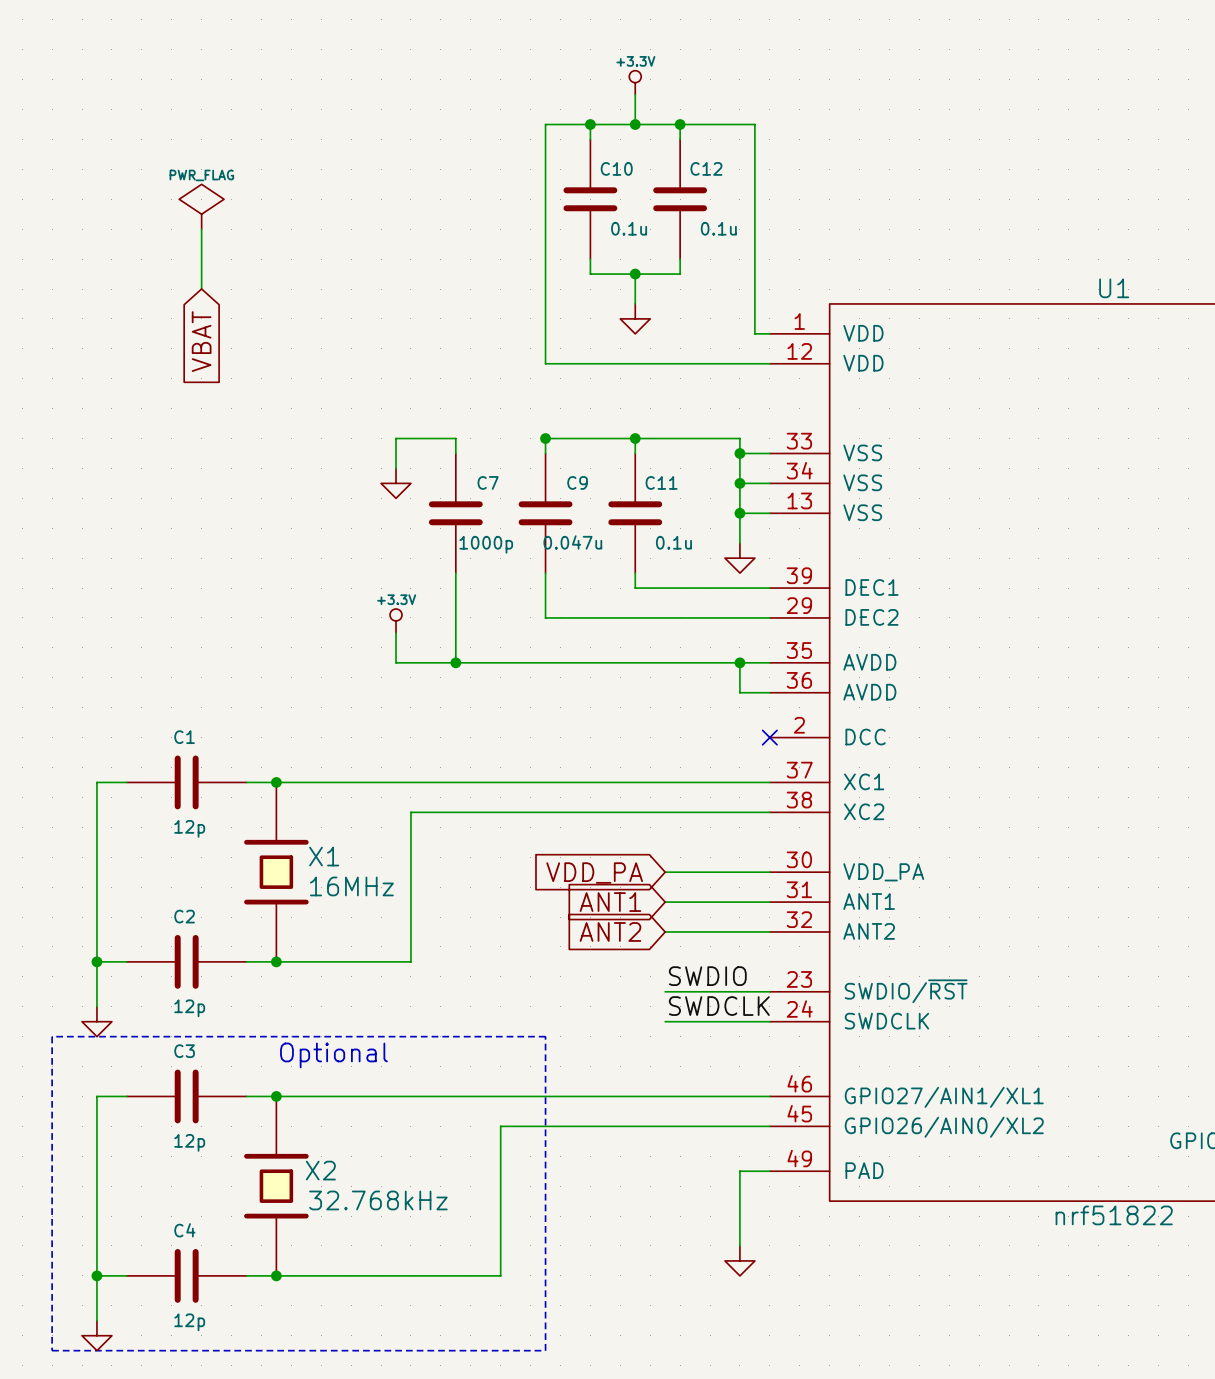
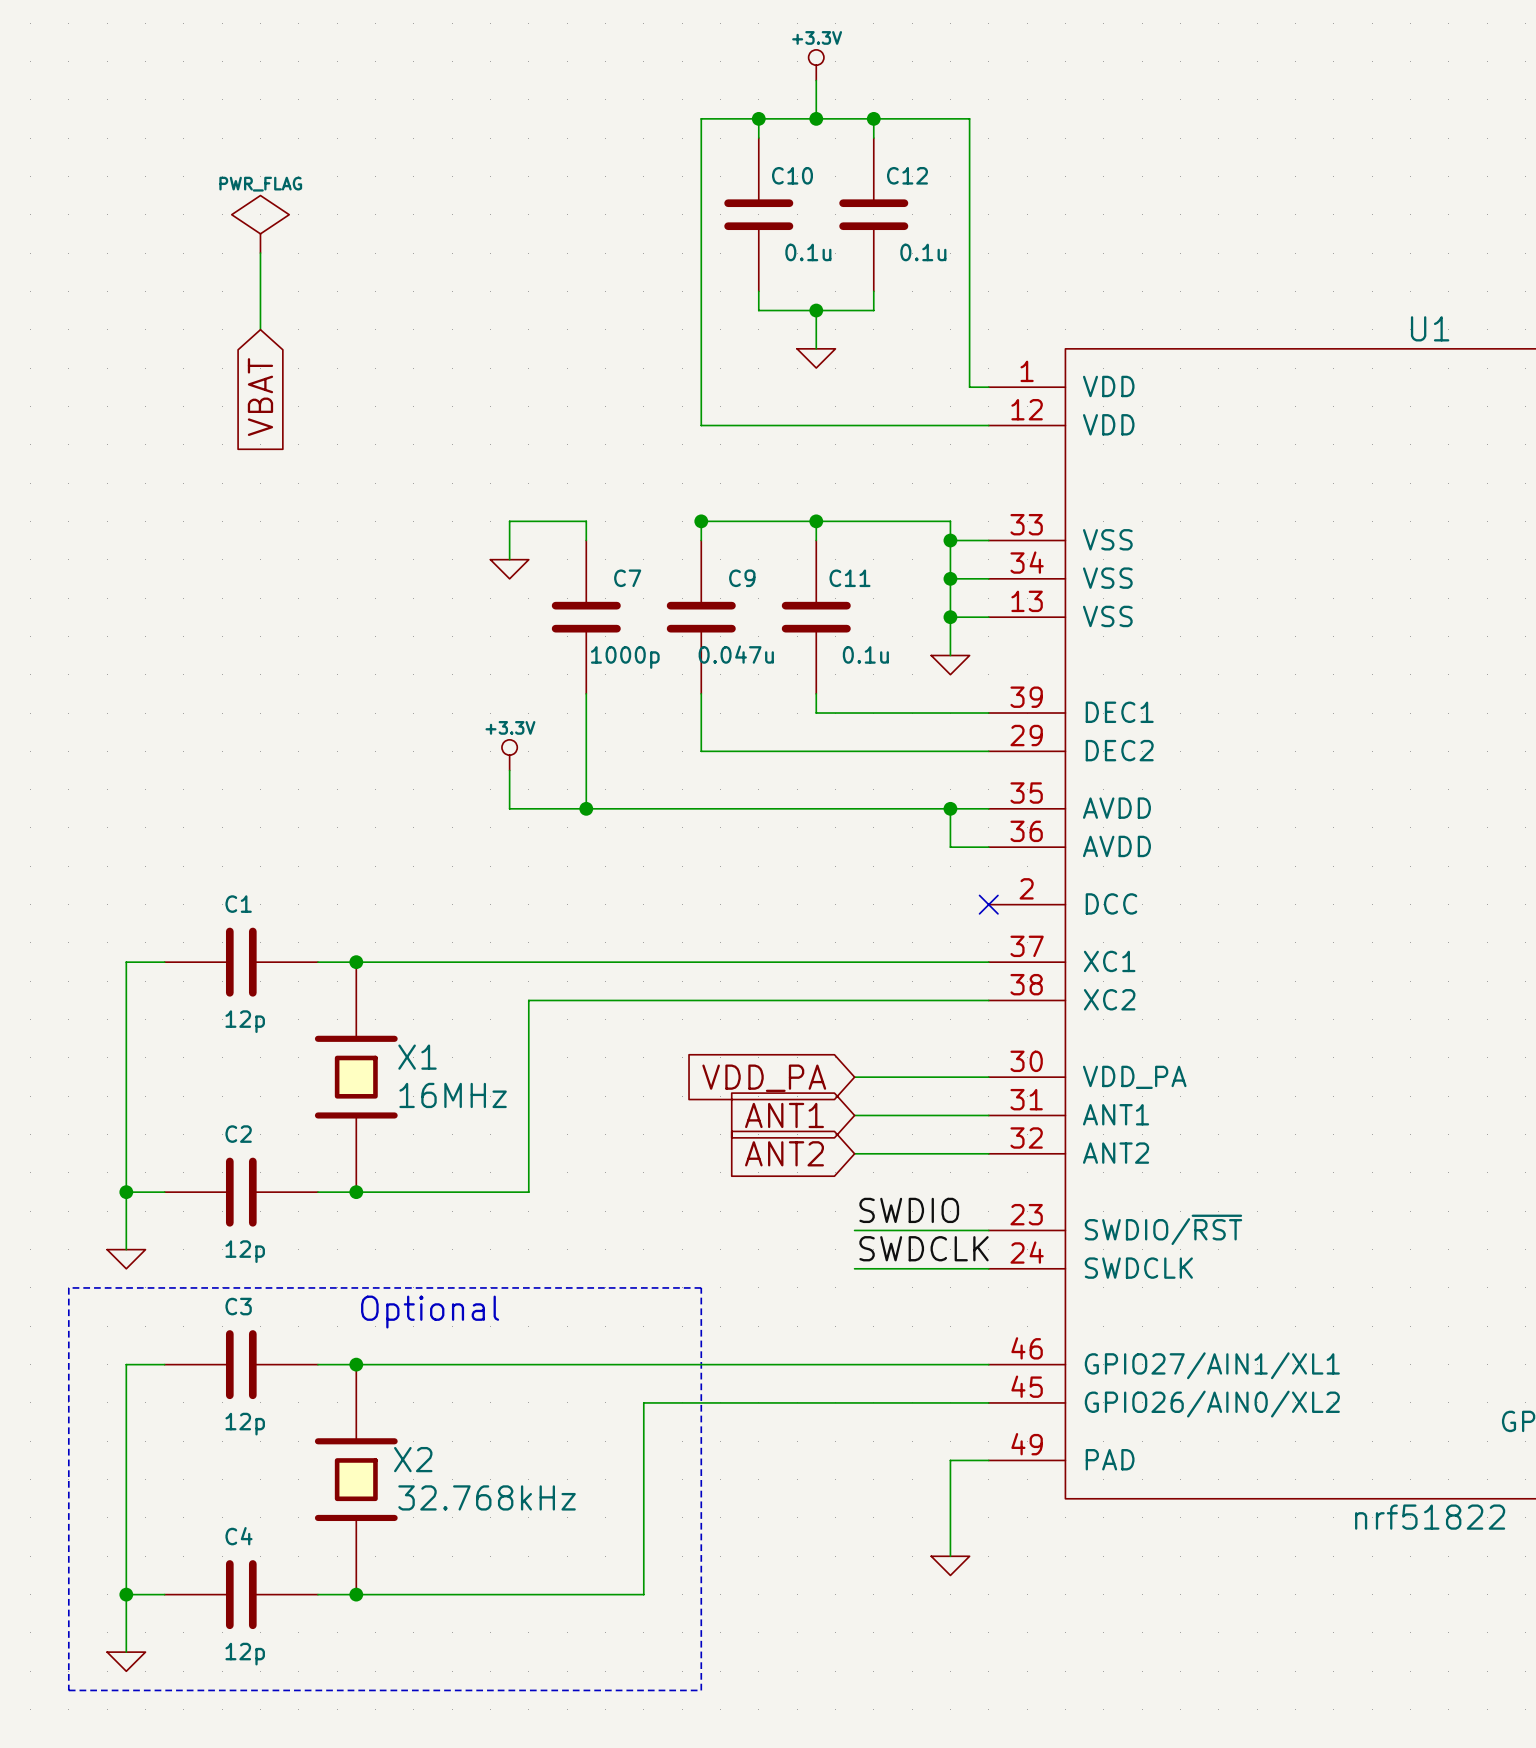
power symbol shape: [620, 303, 651, 334] -> [797, 348, 836, 369]
power symbol shape: [381, 468, 411, 499] -> [490, 559, 529, 579]
power symbol shape: [724, 543, 755, 574] -> [931, 655, 970, 675]
power symbol shape: [82, 1006, 112, 1037] -> [107, 1249, 146, 1269]
power symbol shape: [724, 1245, 755, 1276] -> [931, 1556, 970, 1576]
power symbol shape: [82, 1320, 112, 1351] -> [107, 1652, 146, 1672]

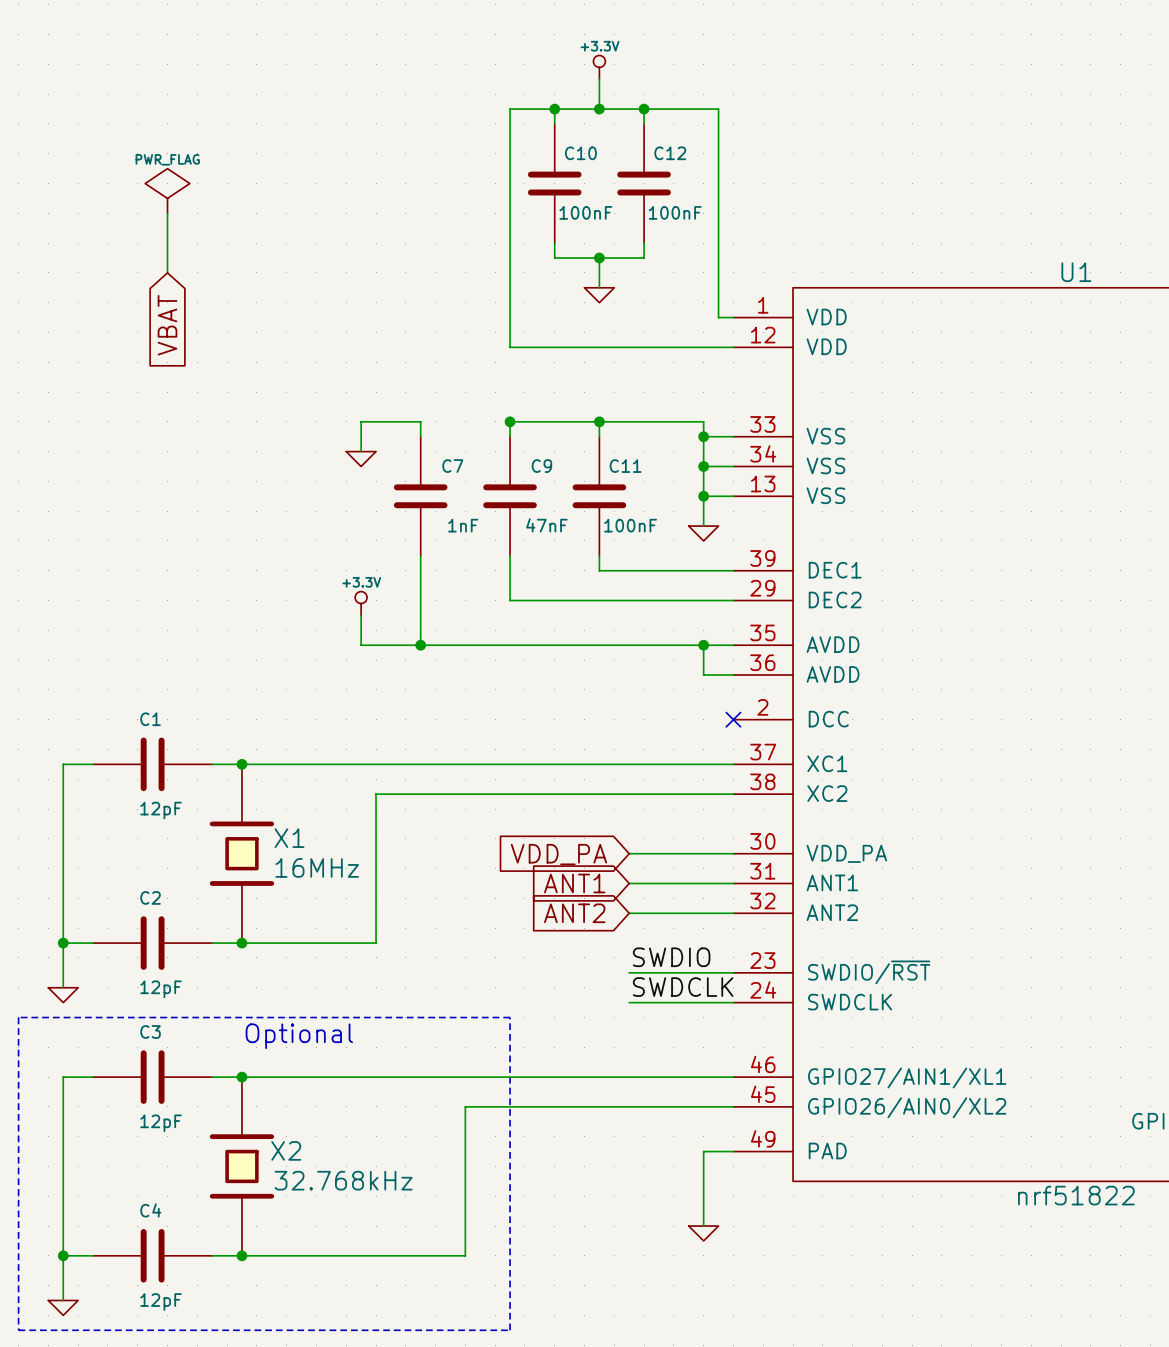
C10 value: 0.1u (808, 252) -> 100nF (585, 212)
C12 value: 0.1u (923, 252) -> 100nF (675, 212)
C9 value: 0.047u (736, 654) -> 47nF (546, 525)
C11 value: 0.1u (865, 654) -> 100nF (630, 525)
C7 value: 1000p (625, 657) -> 1nF (463, 525)
C1 value: 12p (245, 1021) -> 12pF (161, 810)
C2 value: 12p (245, 1251) -> 12pF (161, 989)
C3 value: 12p (245, 1424) -> 12pF (161, 1123)
C4 value: 12p (245, 1654) -> 12pF (161, 1302)

